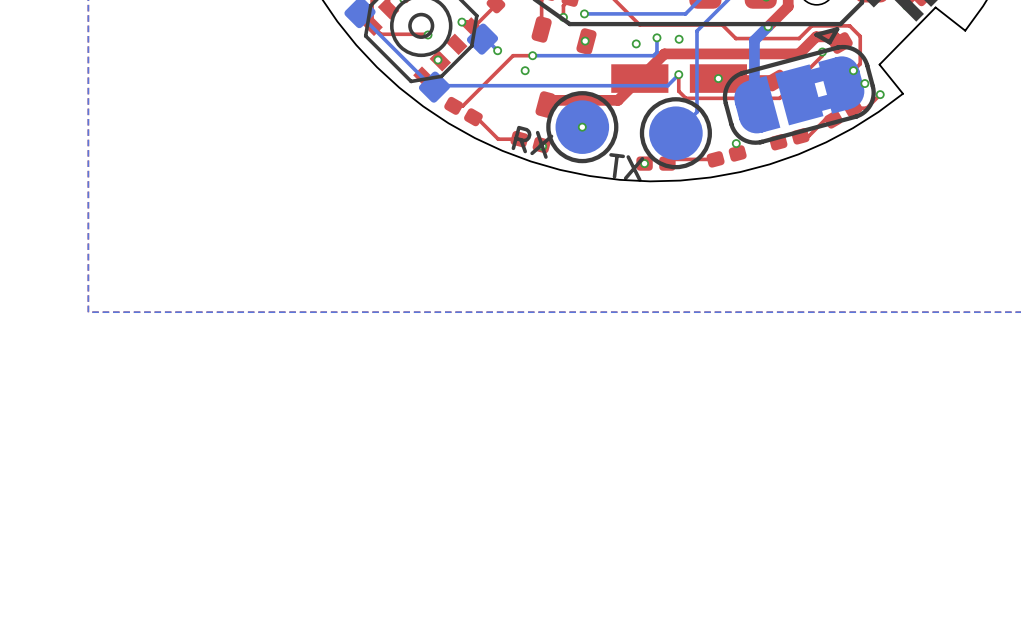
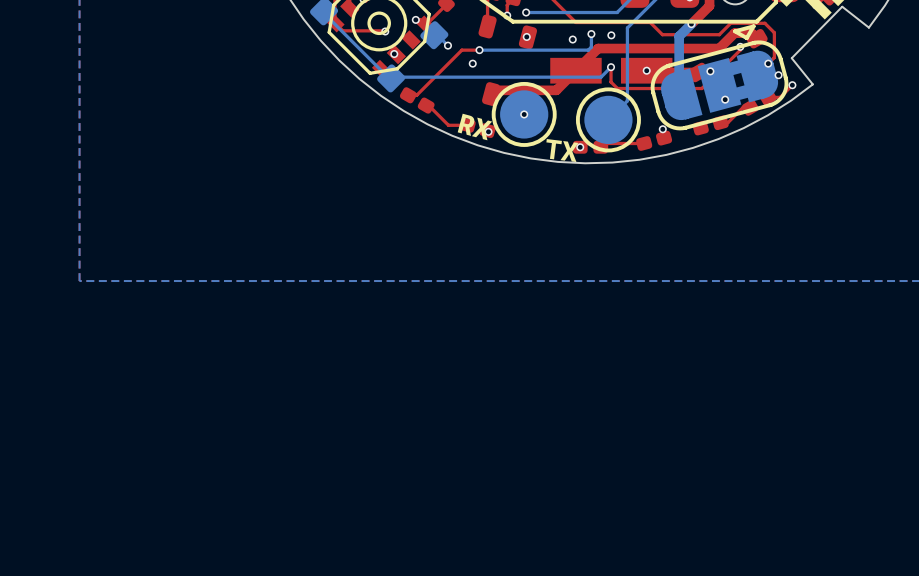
via: none -> (710, 71)
via: none -> (725, 99)

